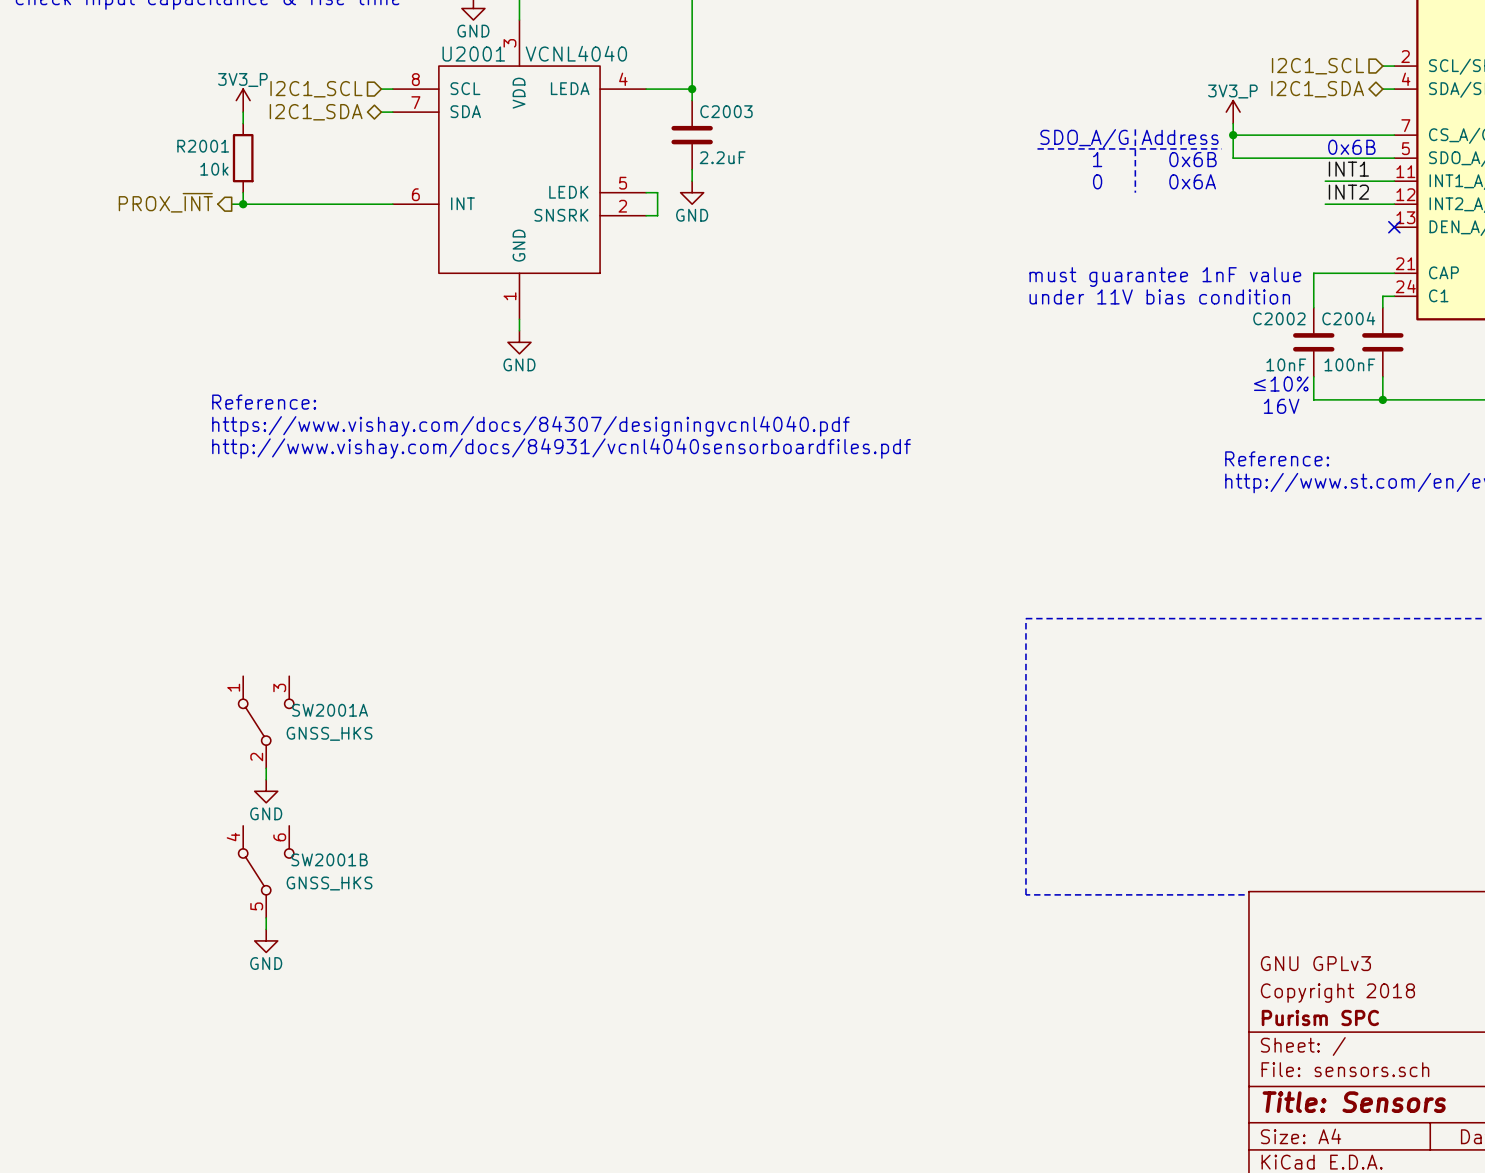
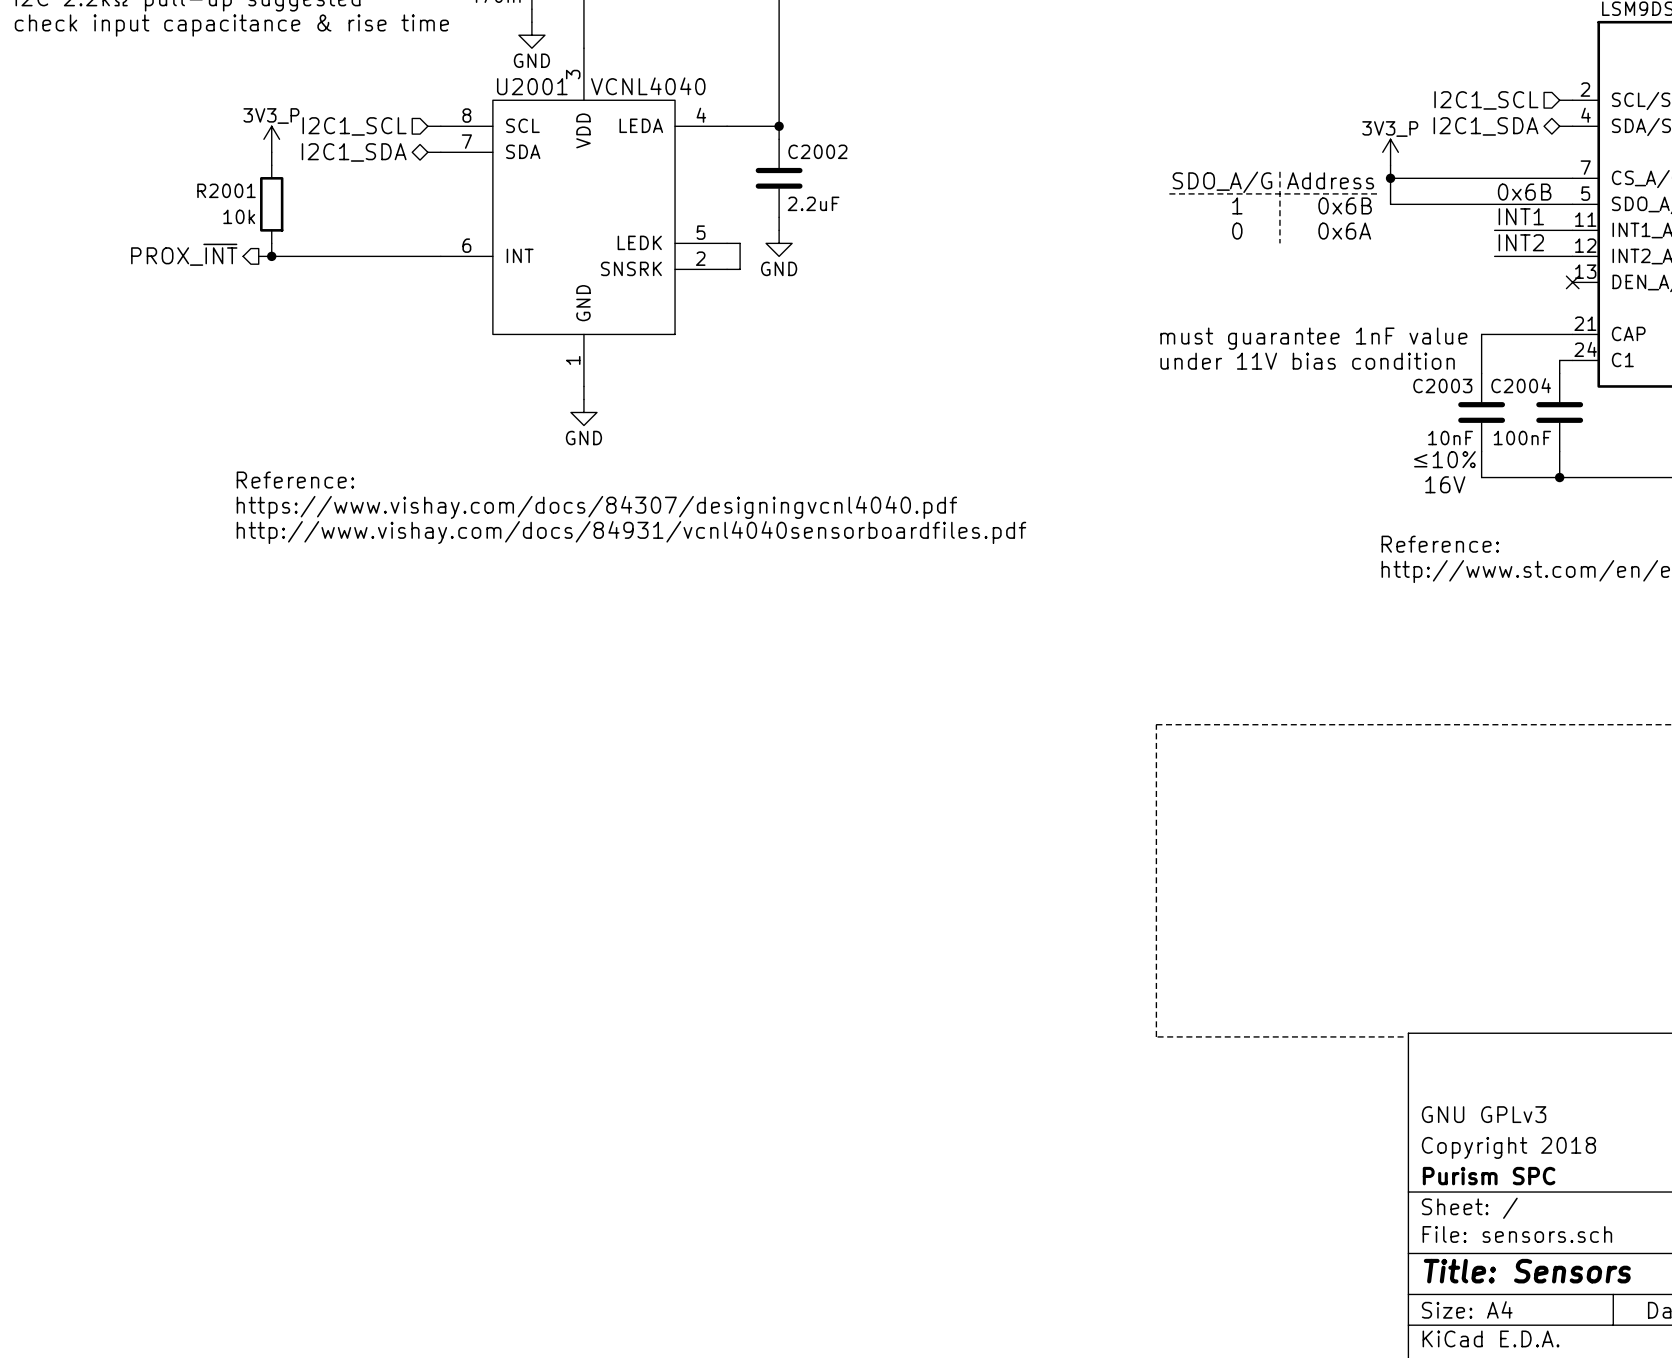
C2003 name: C2003 (726, 111) -> C2002 (817, 151)
C2002 name: C2002 (1279, 318) -> C2003 (1442, 385)
SW2001A: GNSS_HKS (266, 722) -> none
wire: (266, 768) (266, 779) -> none
power symbol: GND (266, 791) -> none
SW2001B: GNSS_HKS (266, 871) -> none
wire: (266, 917) (266, 929) -> none
power symbol: GND (266, 940) -> none

